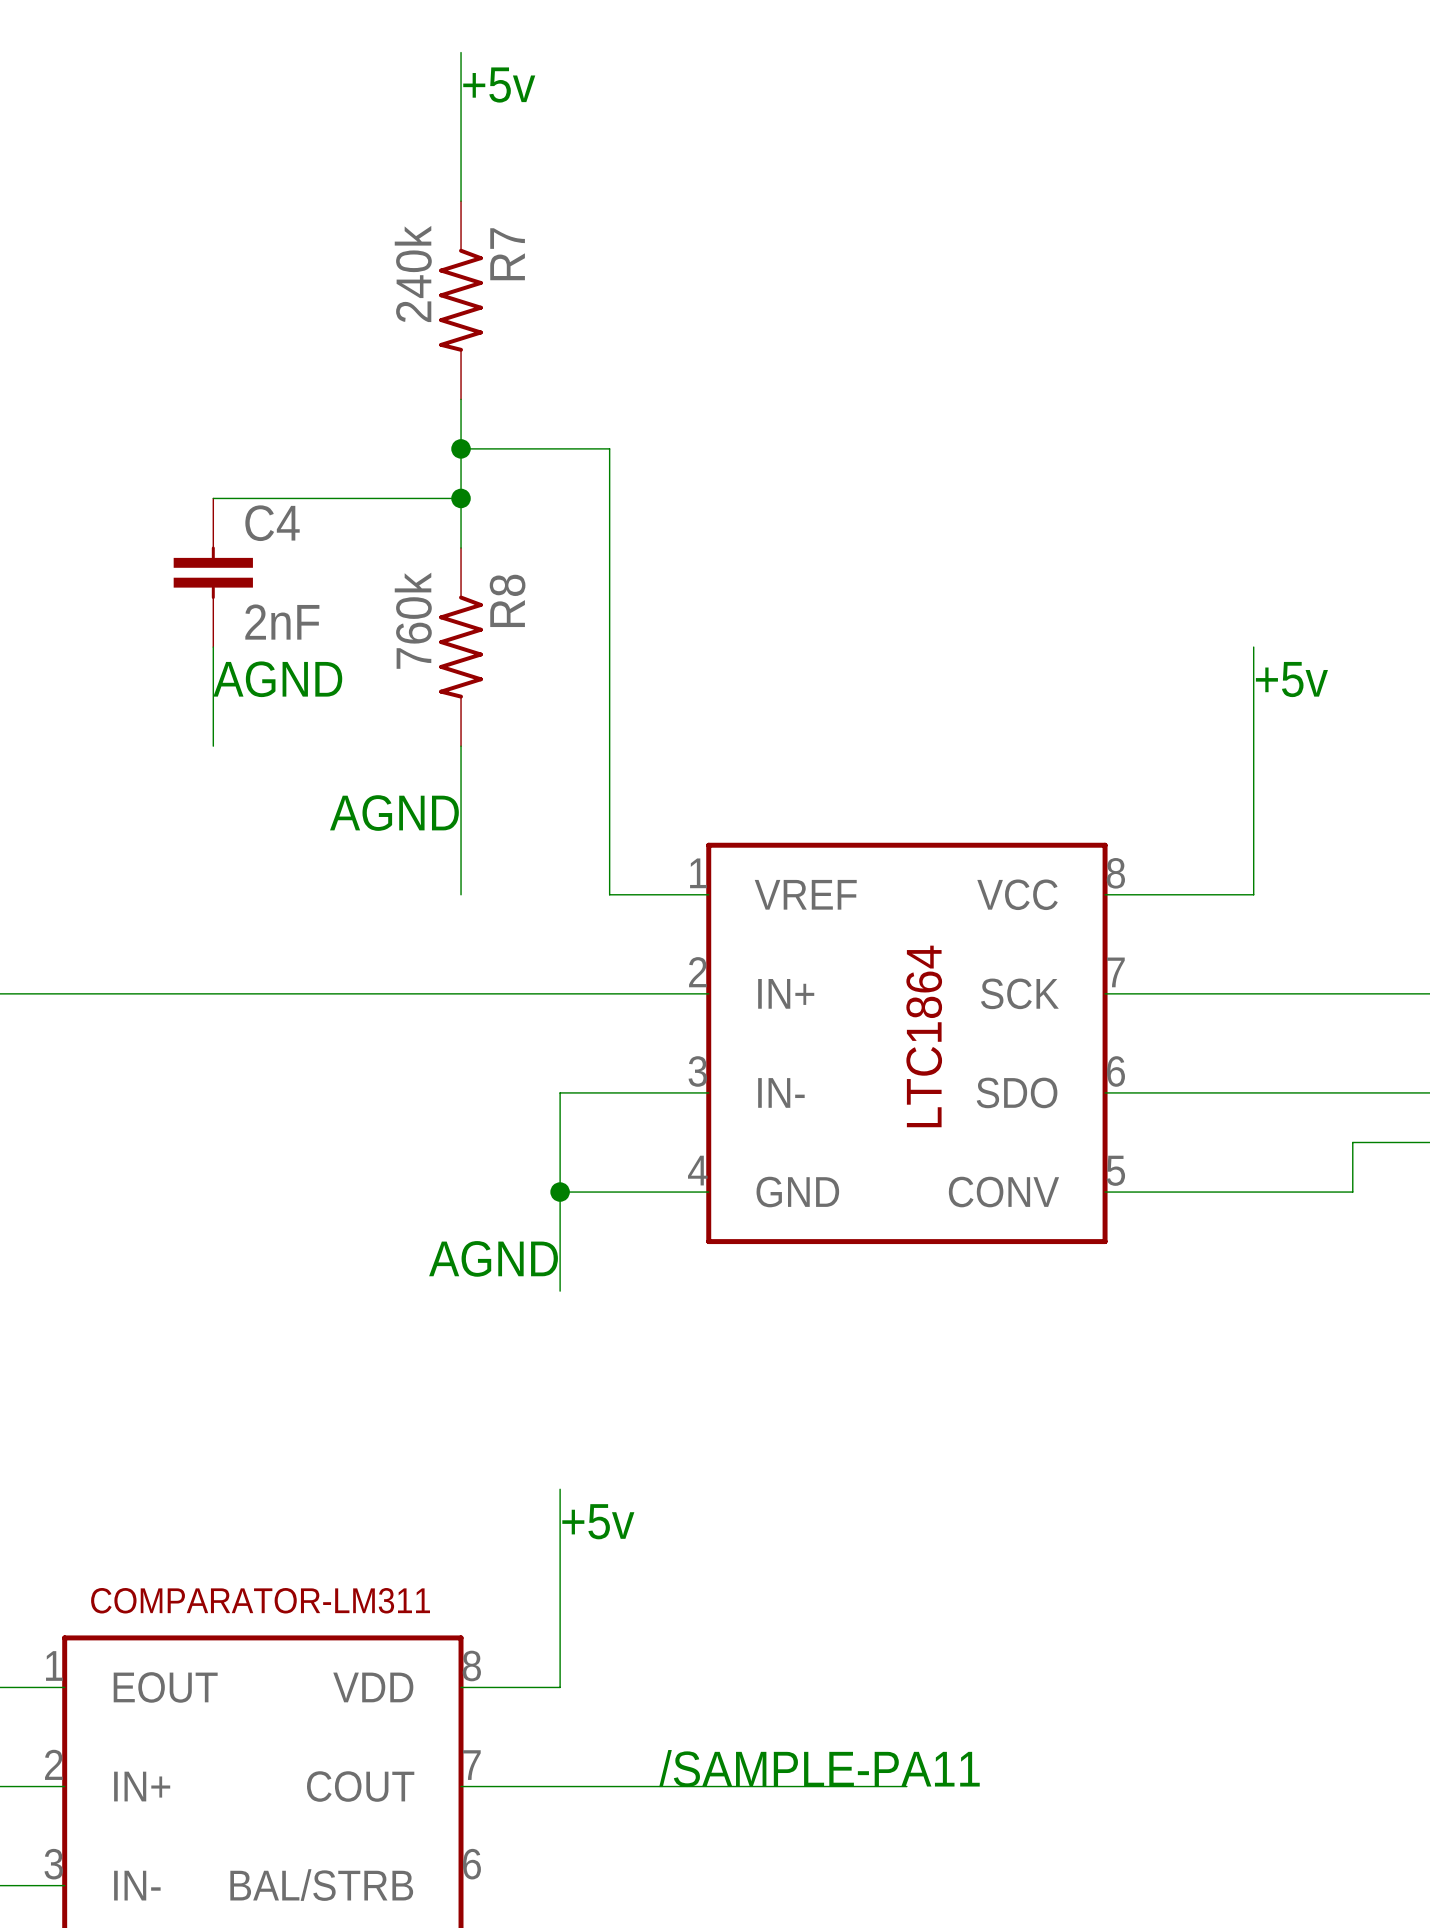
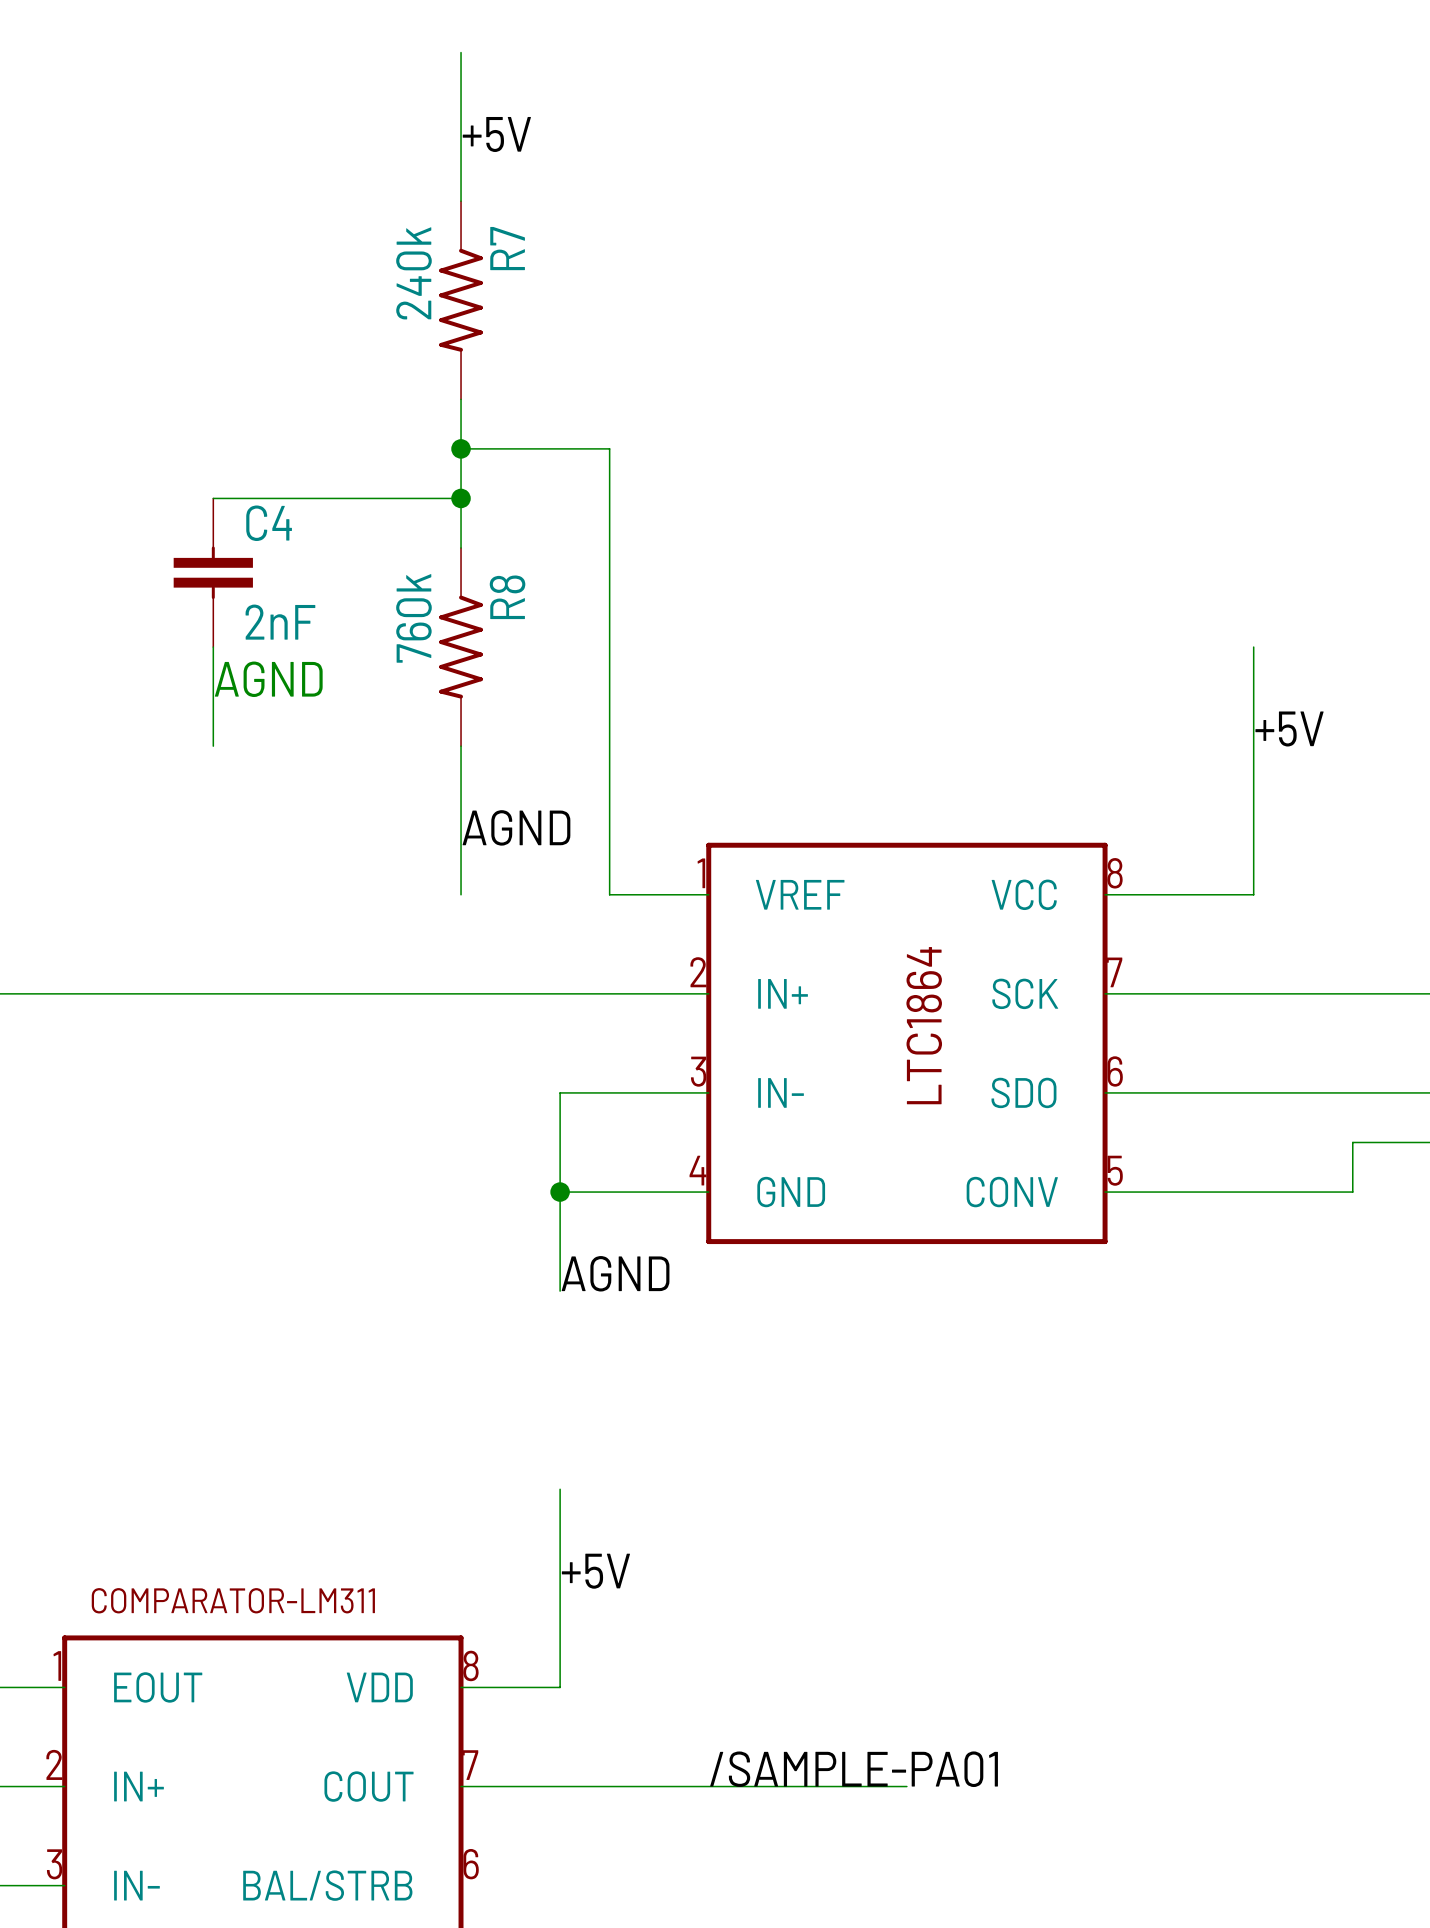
text: +5v (499, 85) -> none
label: none -> +5V (496, 134)
text: +5v (1291, 679) -> none
label: none -> +5V (1289, 728)
text: AGND (394, 813) -> none
label: none -> AGND (516, 827)
text: AGND (493, 1258) -> none
label: none -> AGND (615, 1273)
text: +5v (598, 1521) -> none
label: none -> +5V (595, 1571)
text: /SAMPLE-PA11 (819, 1768) -> none
label: none -> /SAMPLE-PA01 (853, 1769)

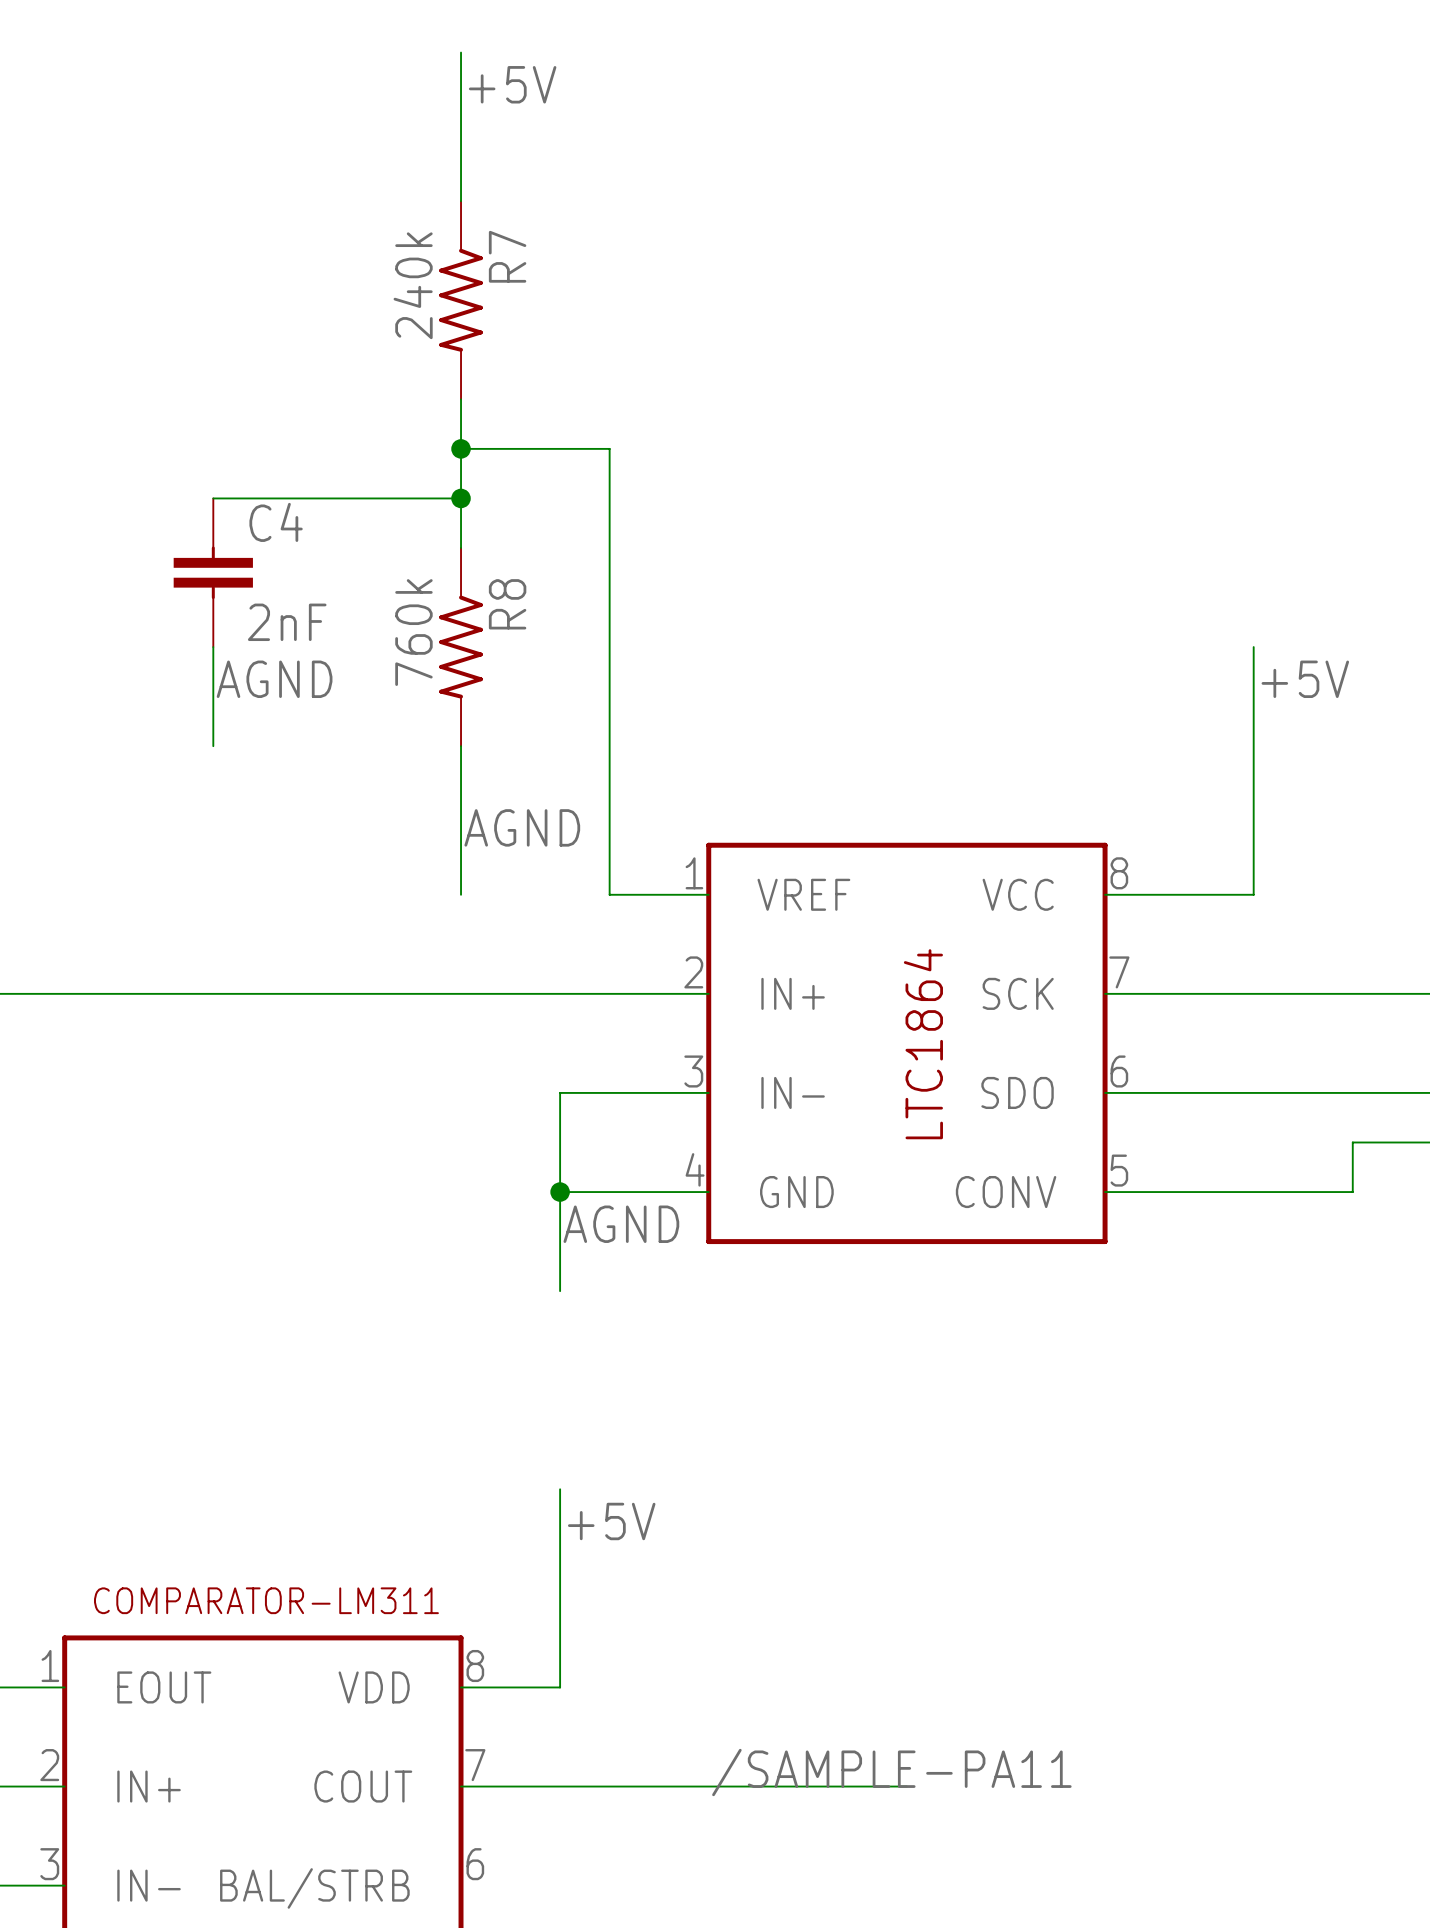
label position: +5V (496, 134) -> +5V (512, 84)
text: AGND (268, 679) -> none
label: none -> AGND (274, 679)
label position: +5V (1289, 728) -> +5V (1305, 679)
label position: AGND (615, 1273) -> AGND (621, 1224)
label position: +5V (595, 1571) -> +5V (611, 1521)
label: /SAMPLE-PA01 (853, 1769) -> /SAMPLE-PA11 (891, 1772)

